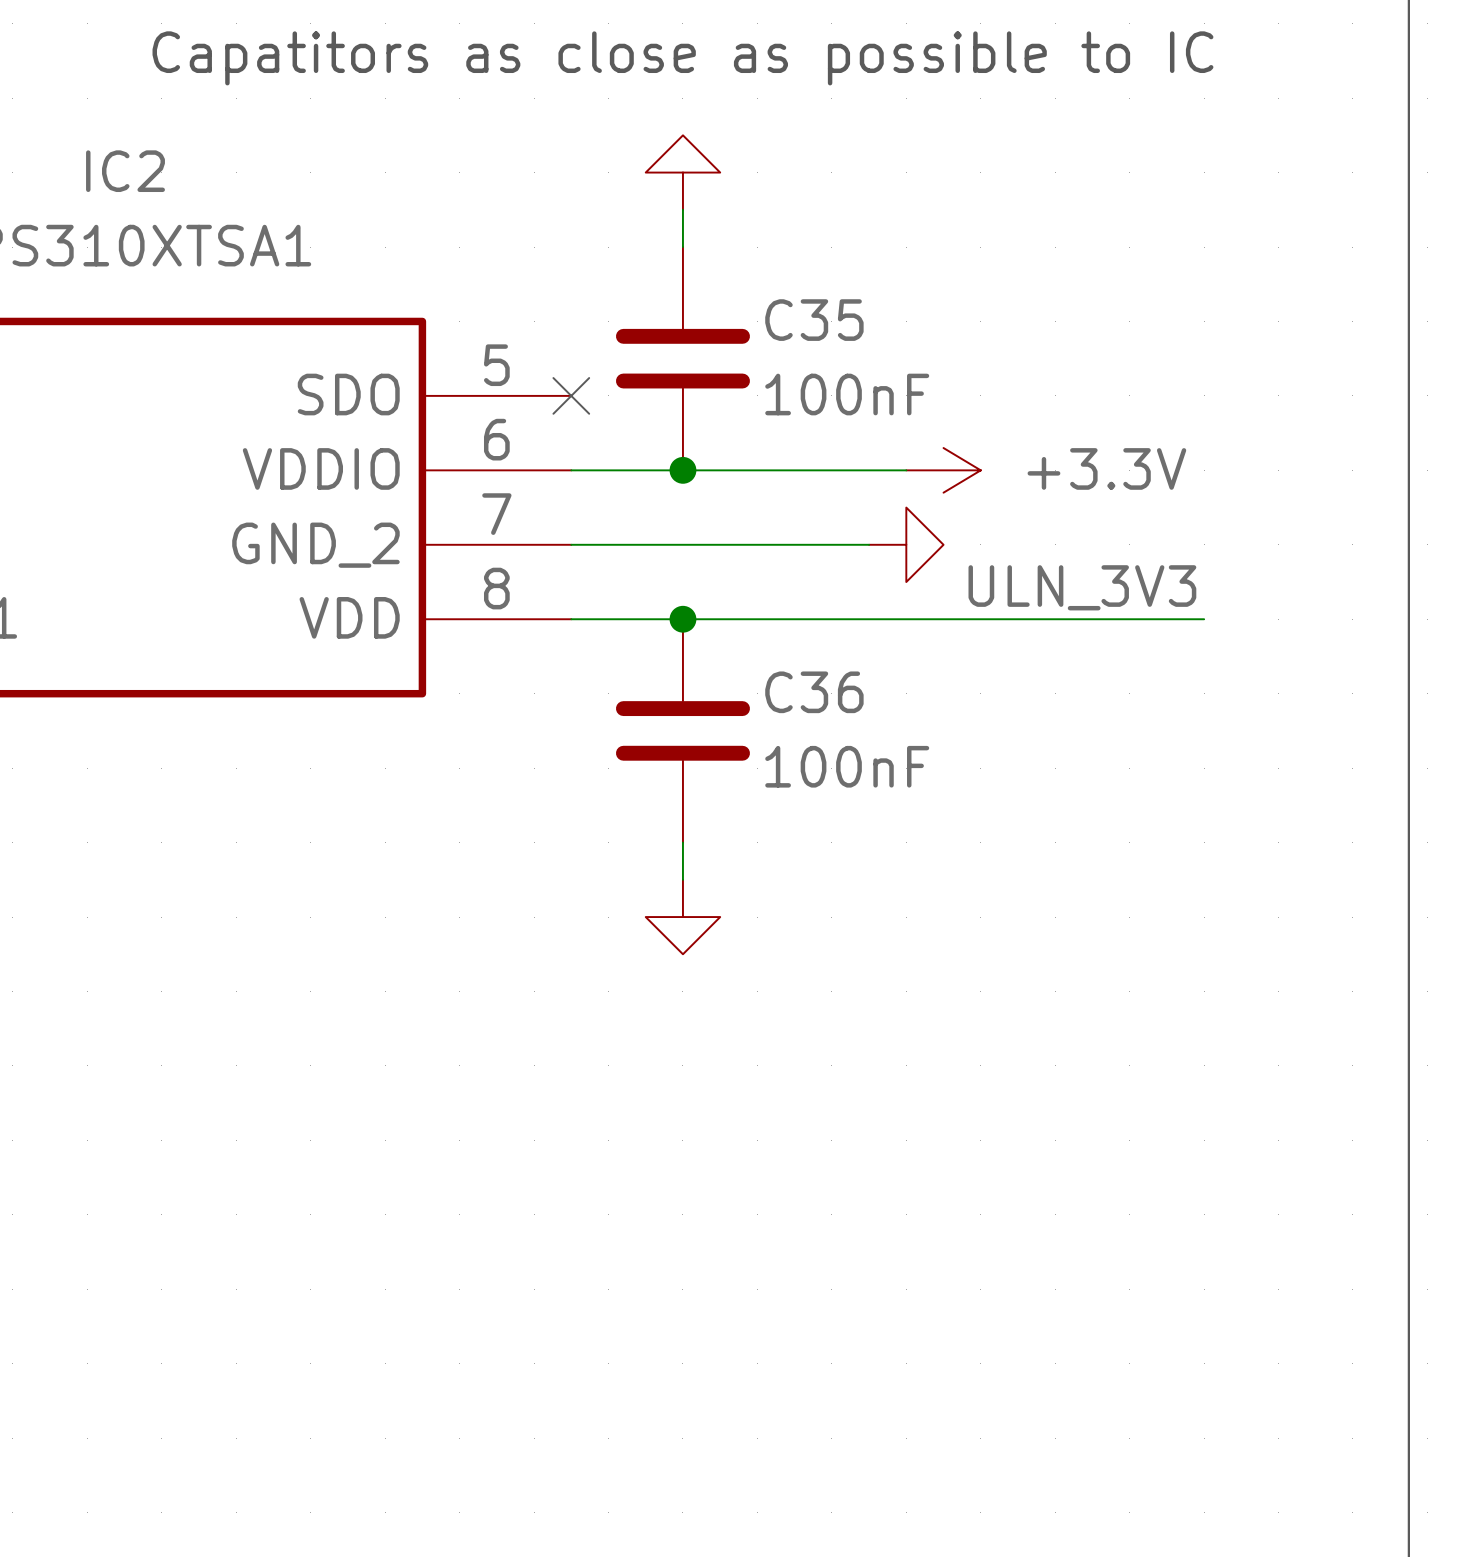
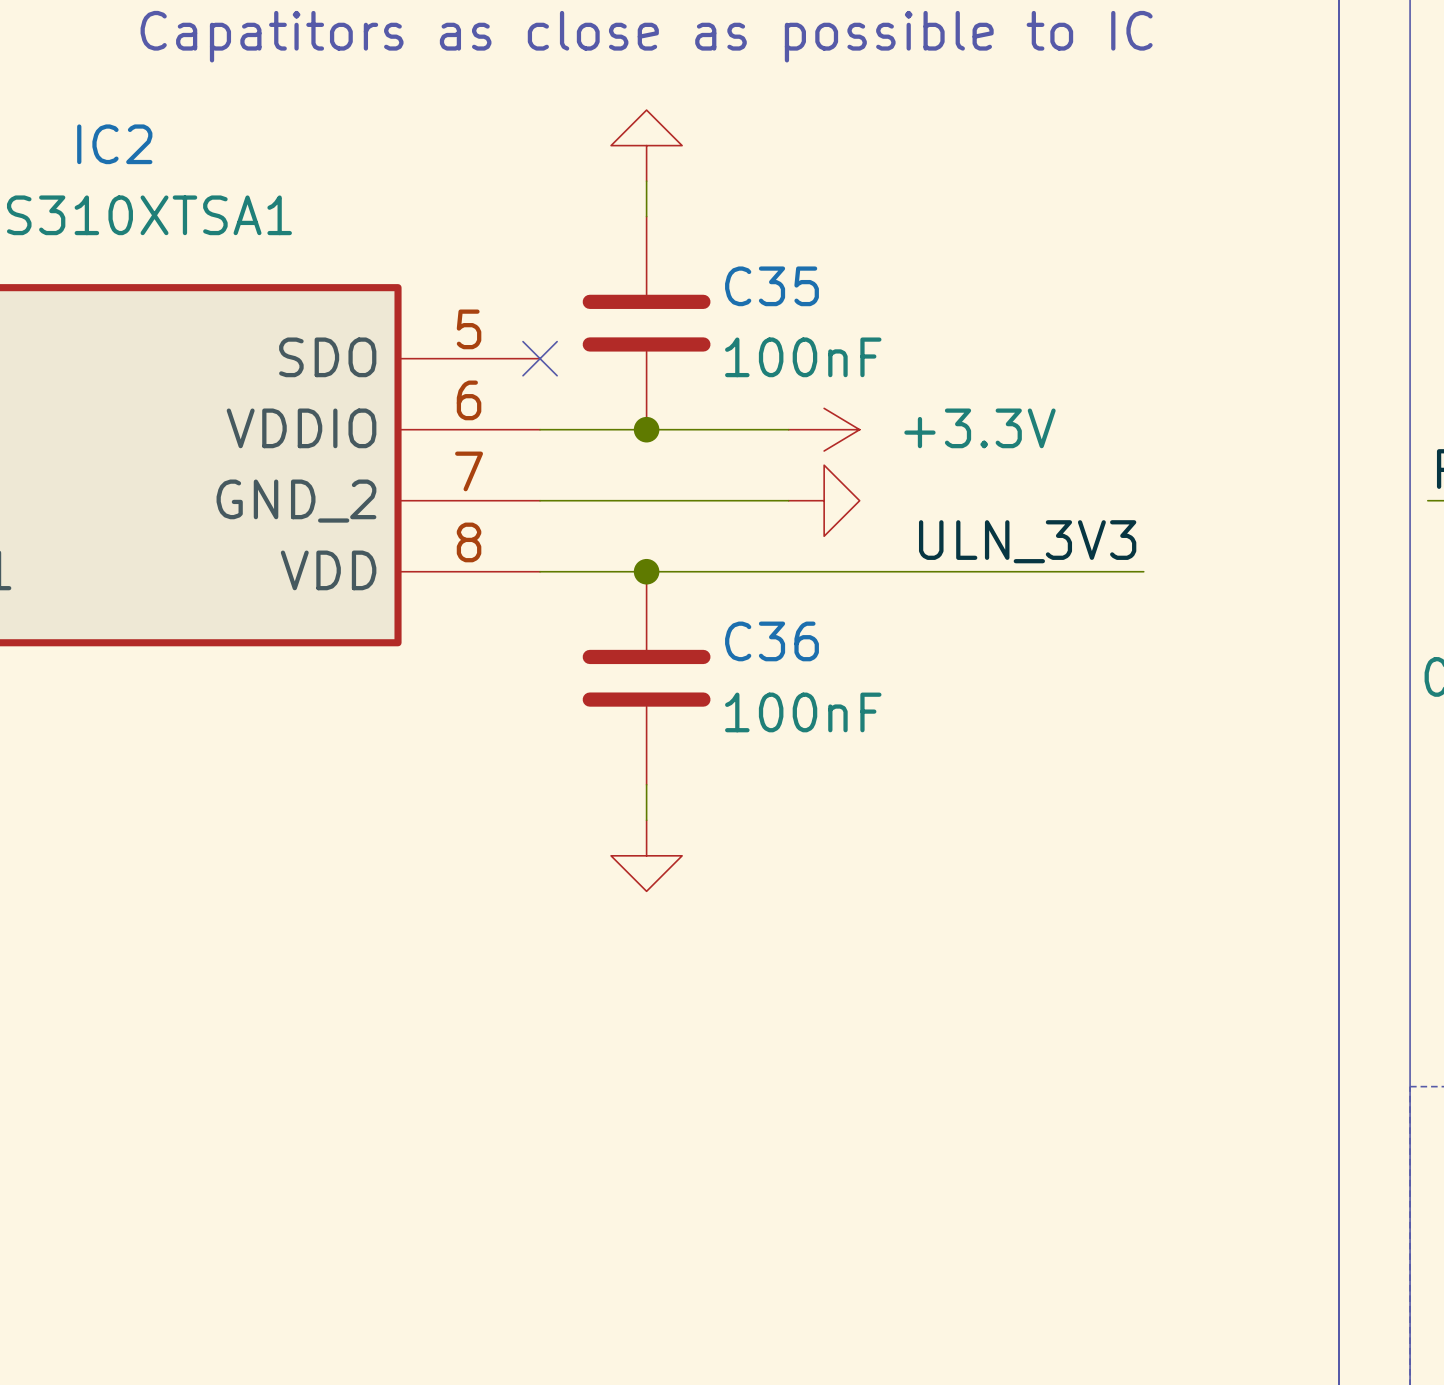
power symbol position: +3.3V (943, 470) -> +3.3V (824, 429)
power symbol position: (906, 544) -> (824, 500)

